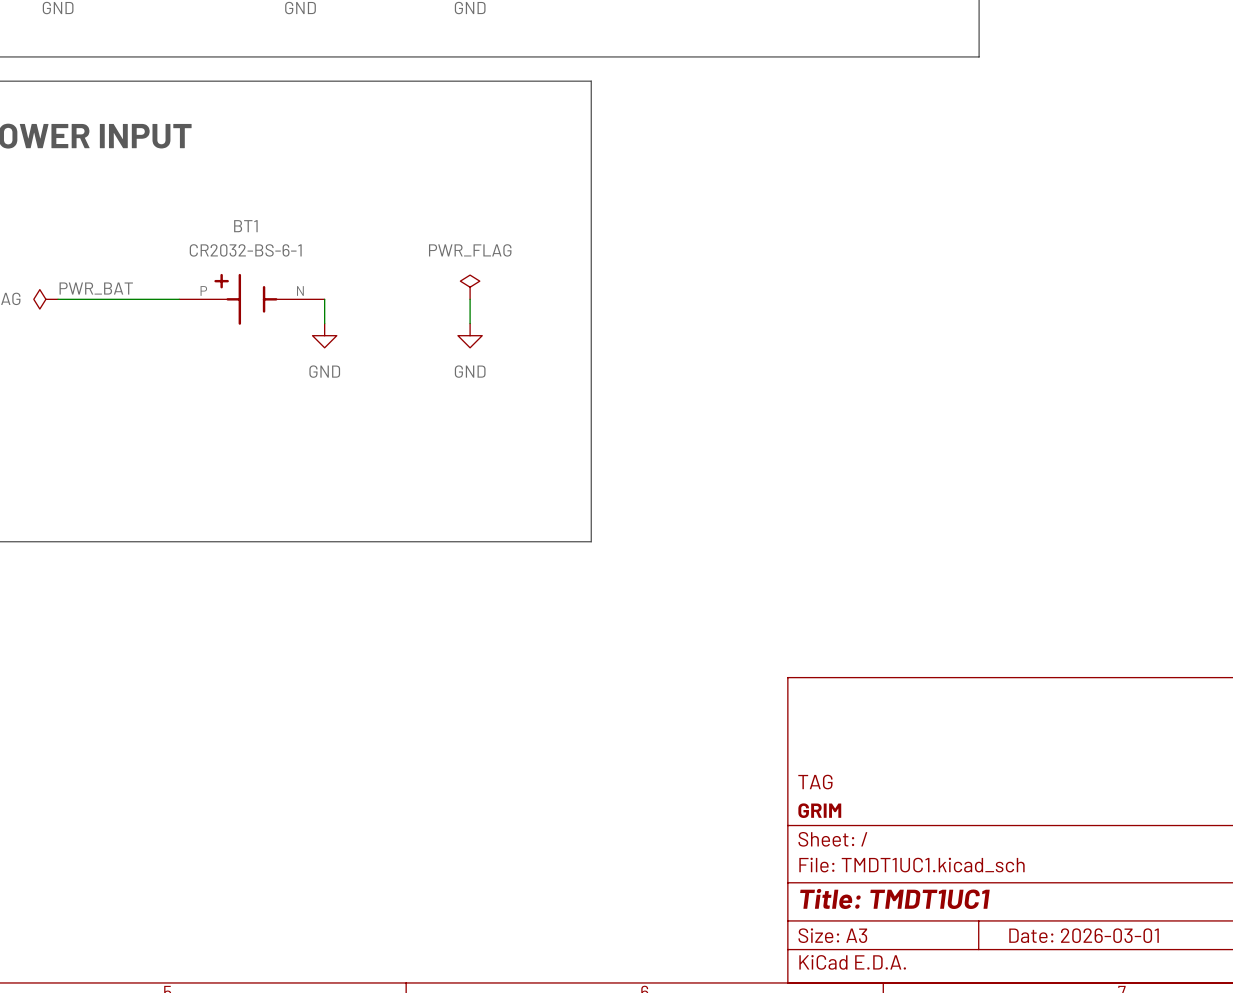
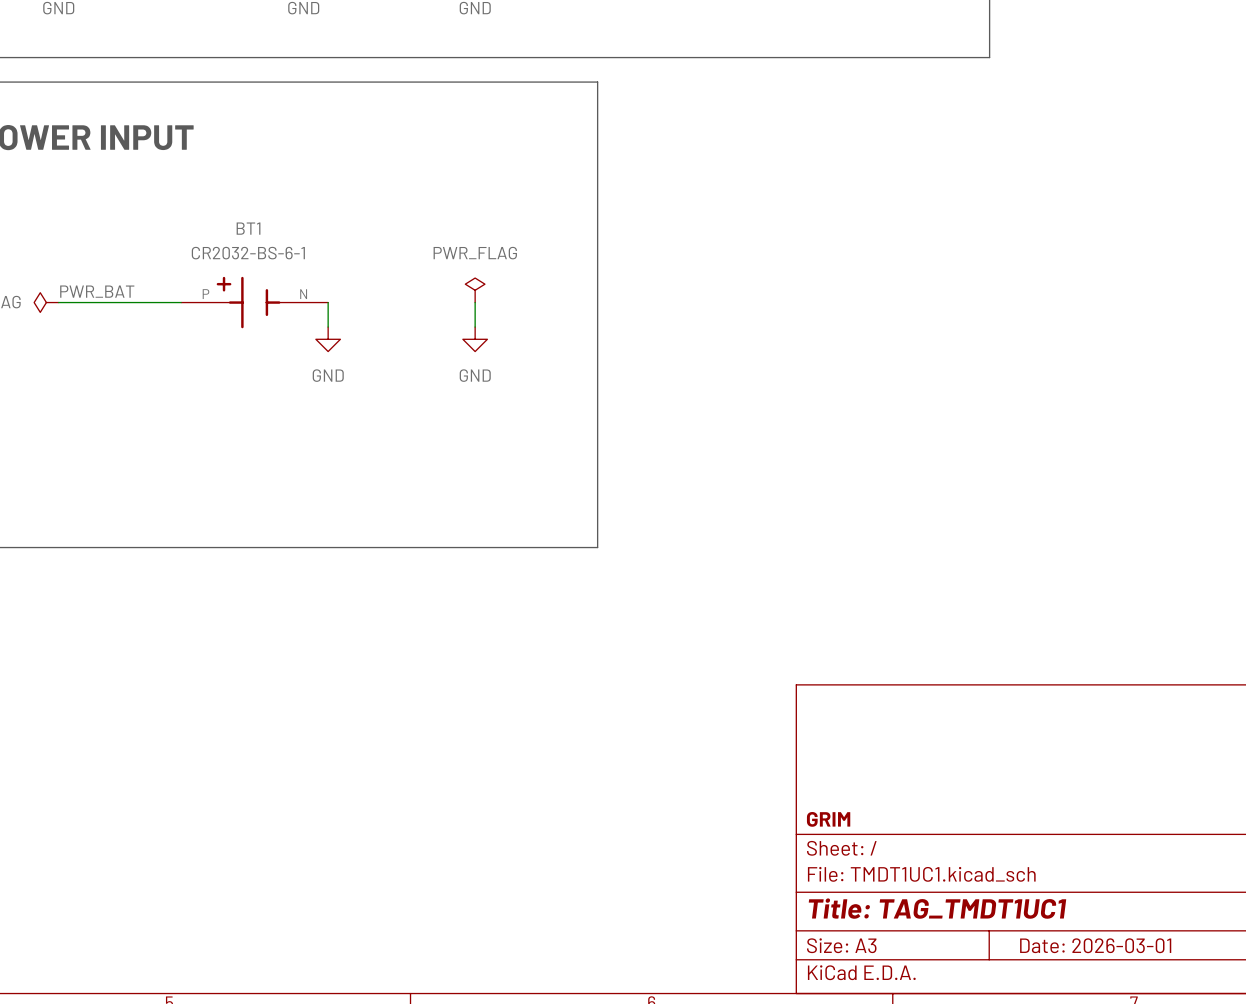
title block: TAG (815, 782) -> none
title block: Title: TMDT1UC1 (894, 898) -> Title: TAG_TMDT1UC1 (937, 908)

